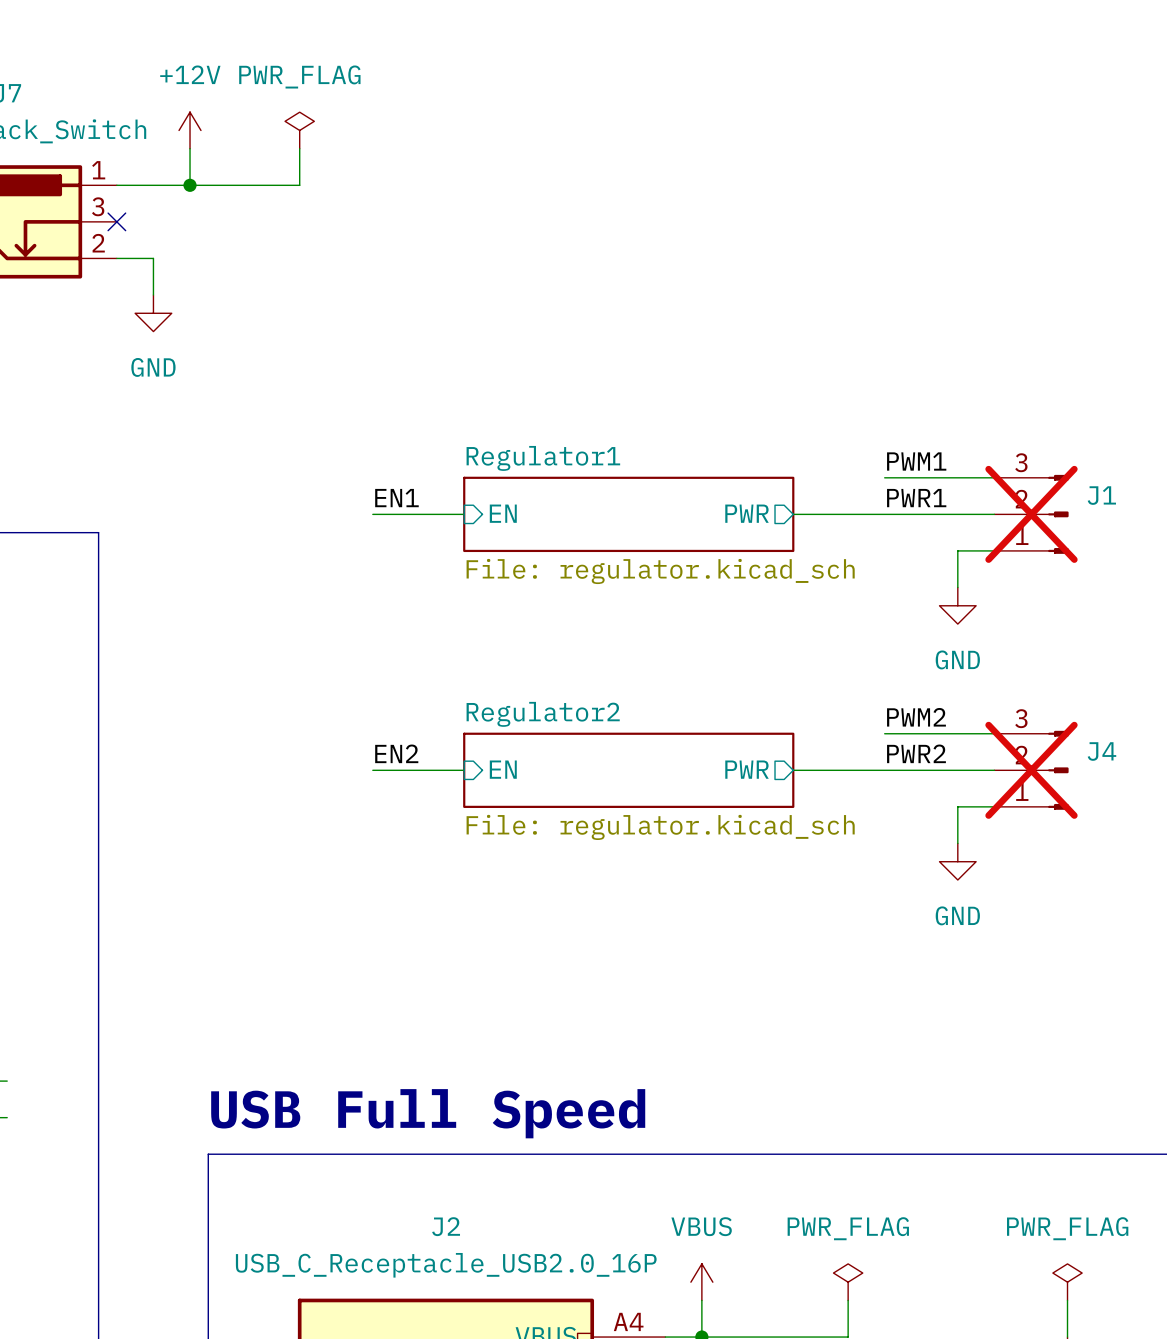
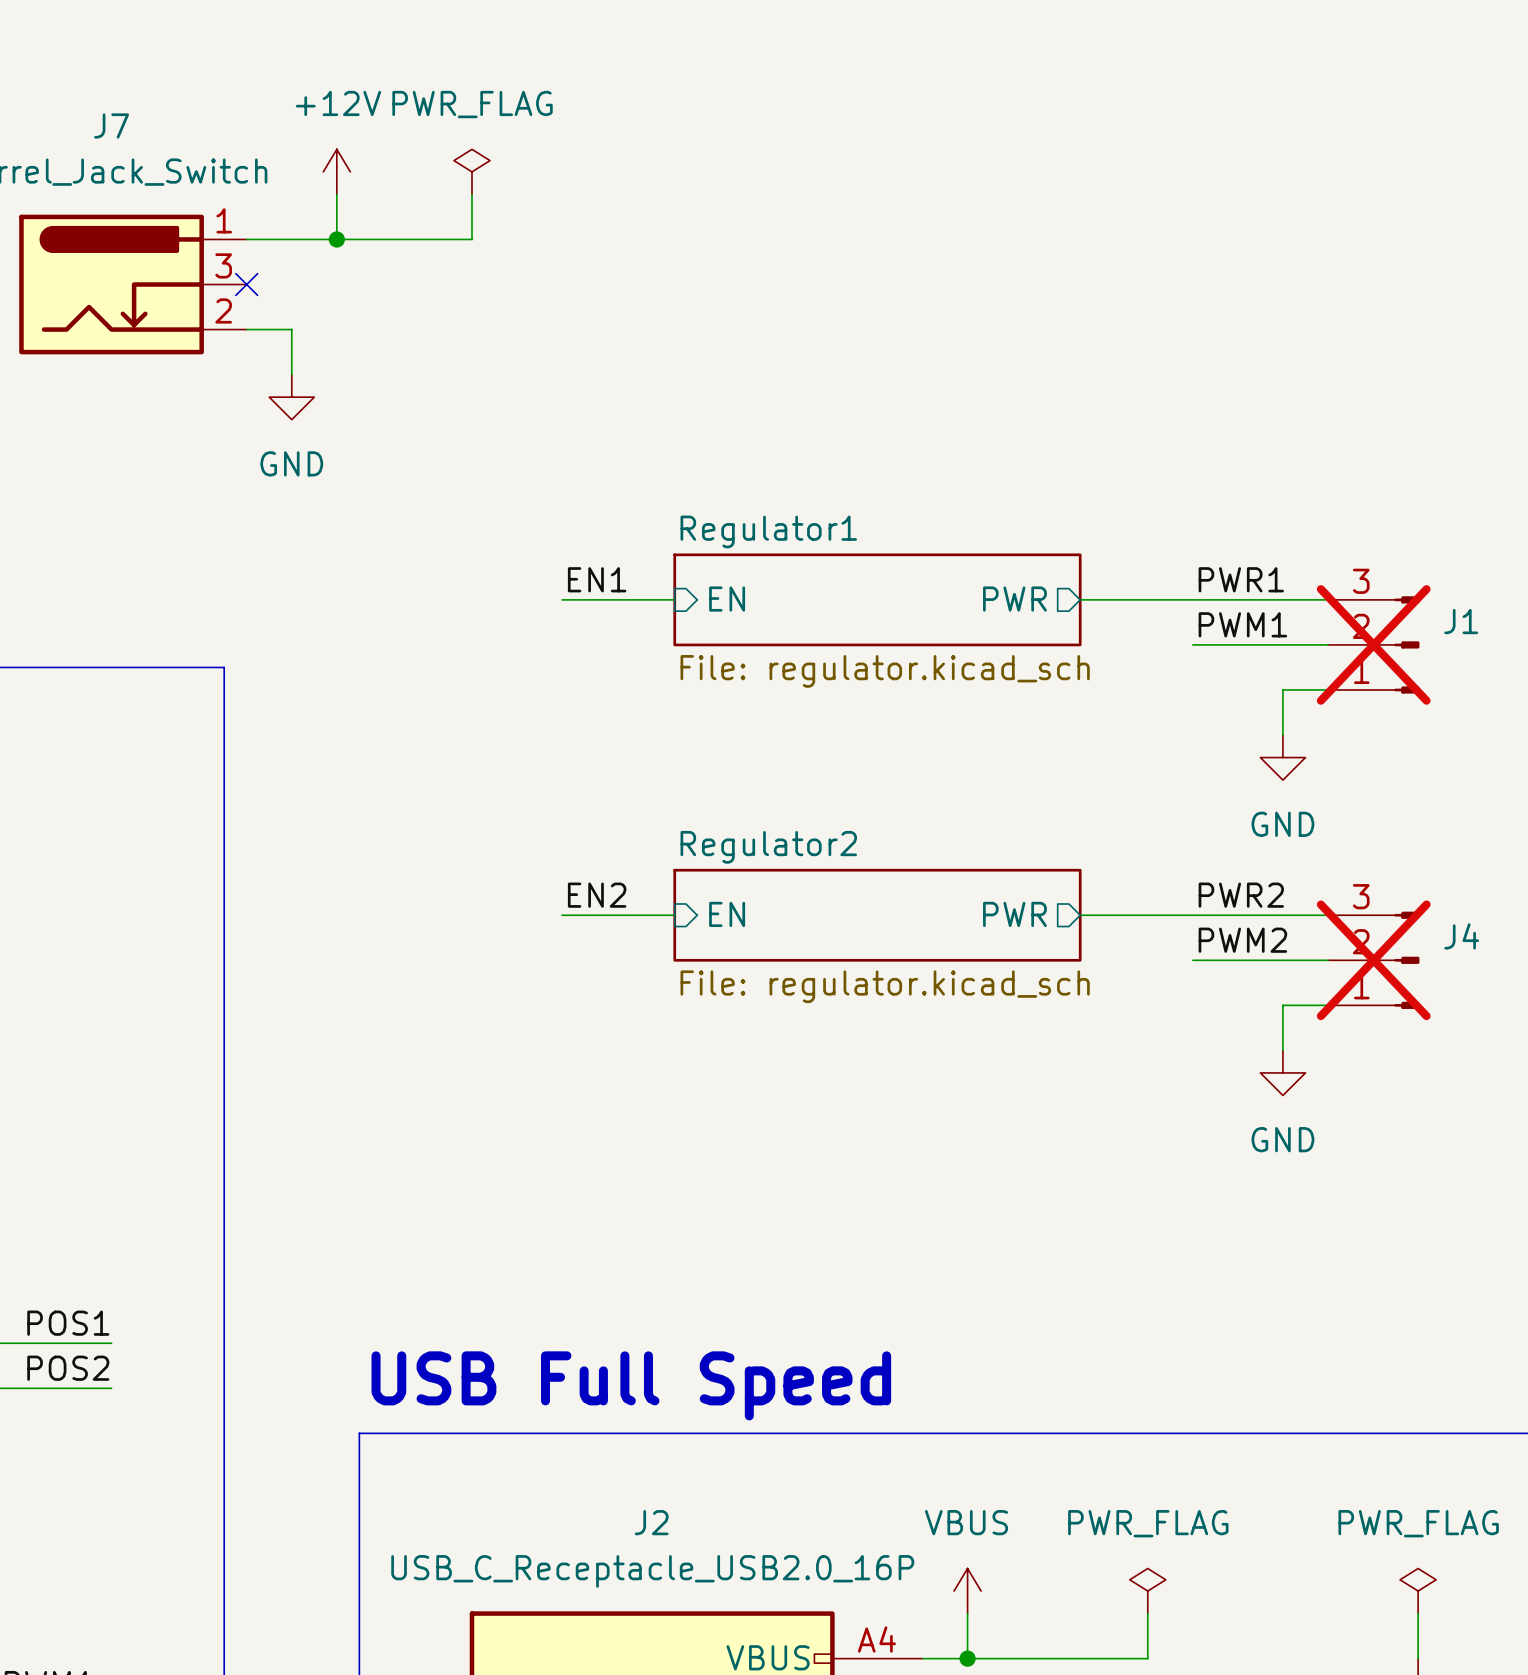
label: PWM1 (916, 461) -> PWR1 (1241, 579)
label position: EN1 (396, 498) -> EN1 (597, 579)
label: PWR1 (916, 498) -> PWM1 (1242, 624)
sheet pin position: EN (503, 513) -> EN (727, 599)
sheet pin position: PWR (747, 513) -> PWR (1014, 599)
wire: (372, 514) (464, 514) -> (562, 599) (674, 599)
sheet Regulator1 position: (628, 514) -> (877, 599)
wire: (793, 514) (884, 514) -> (1080, 599) (1192, 599)
label: PWM2 (916, 717) -> PWR2 (1241, 895)
label position: EN2 (396, 753) -> EN2 (597, 895)
label: PWR2 (916, 753) -> PWM2 (1242, 940)
sheet pin position: EN (503, 769) -> EN (727, 914)
sheet pin position: PWR (747, 769) -> PWR (1014, 914)
wire: (372, 770) (464, 770) -> (562, 915) (674, 915)
sheet Regulator2 position: (628, 770) -> (877, 915)
wire: (793, 770) (884, 770) -> (1080, 915) (1192, 915)

